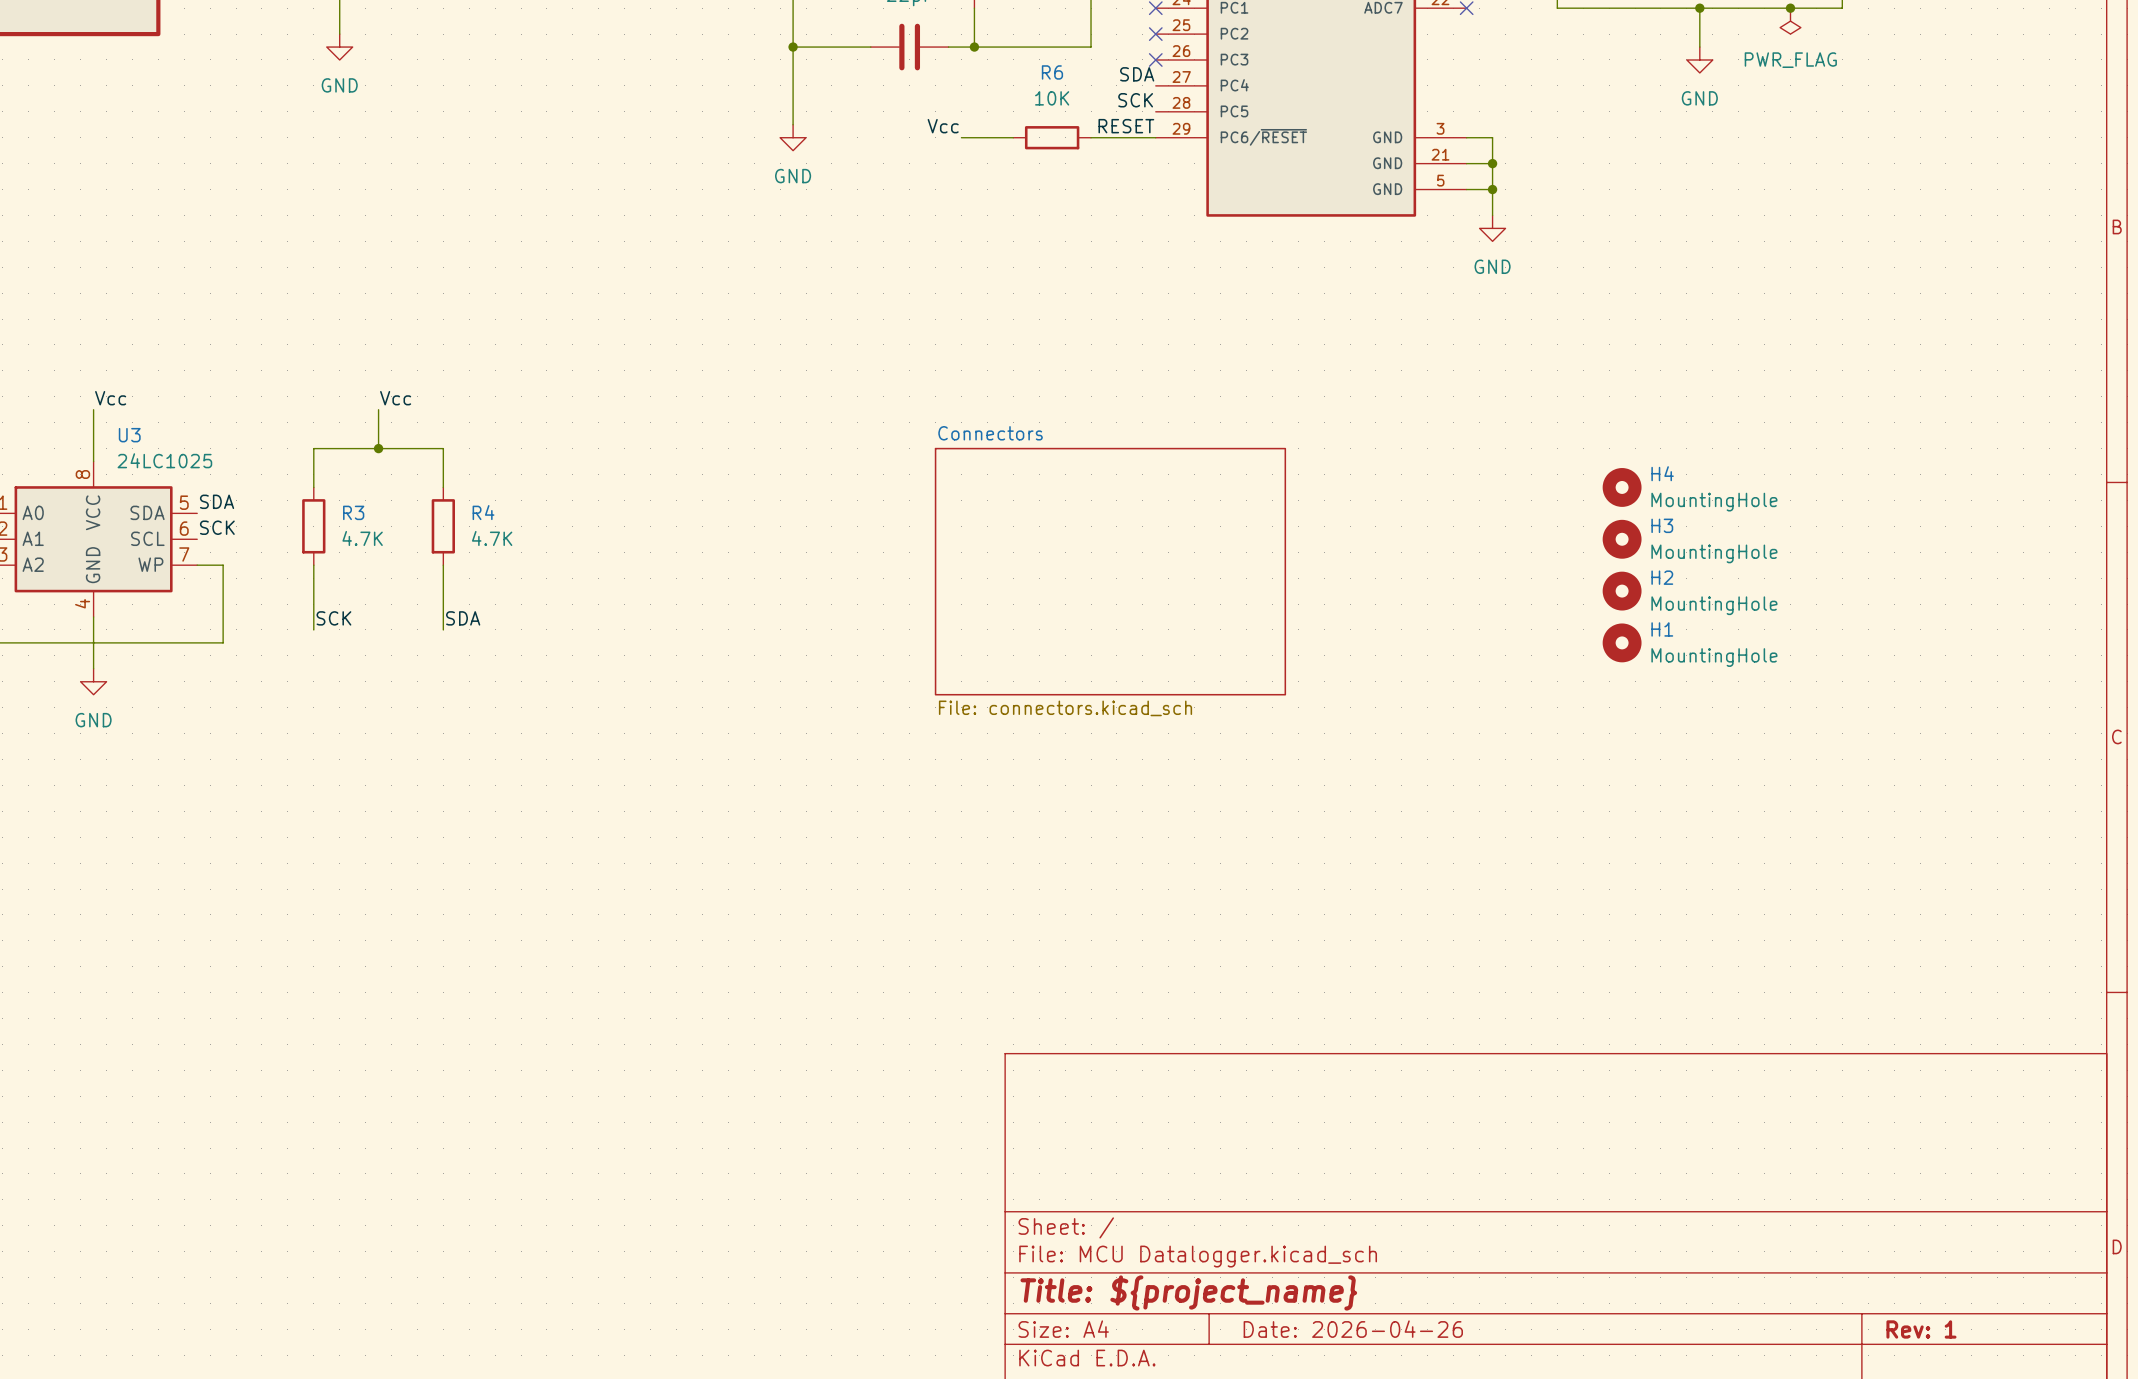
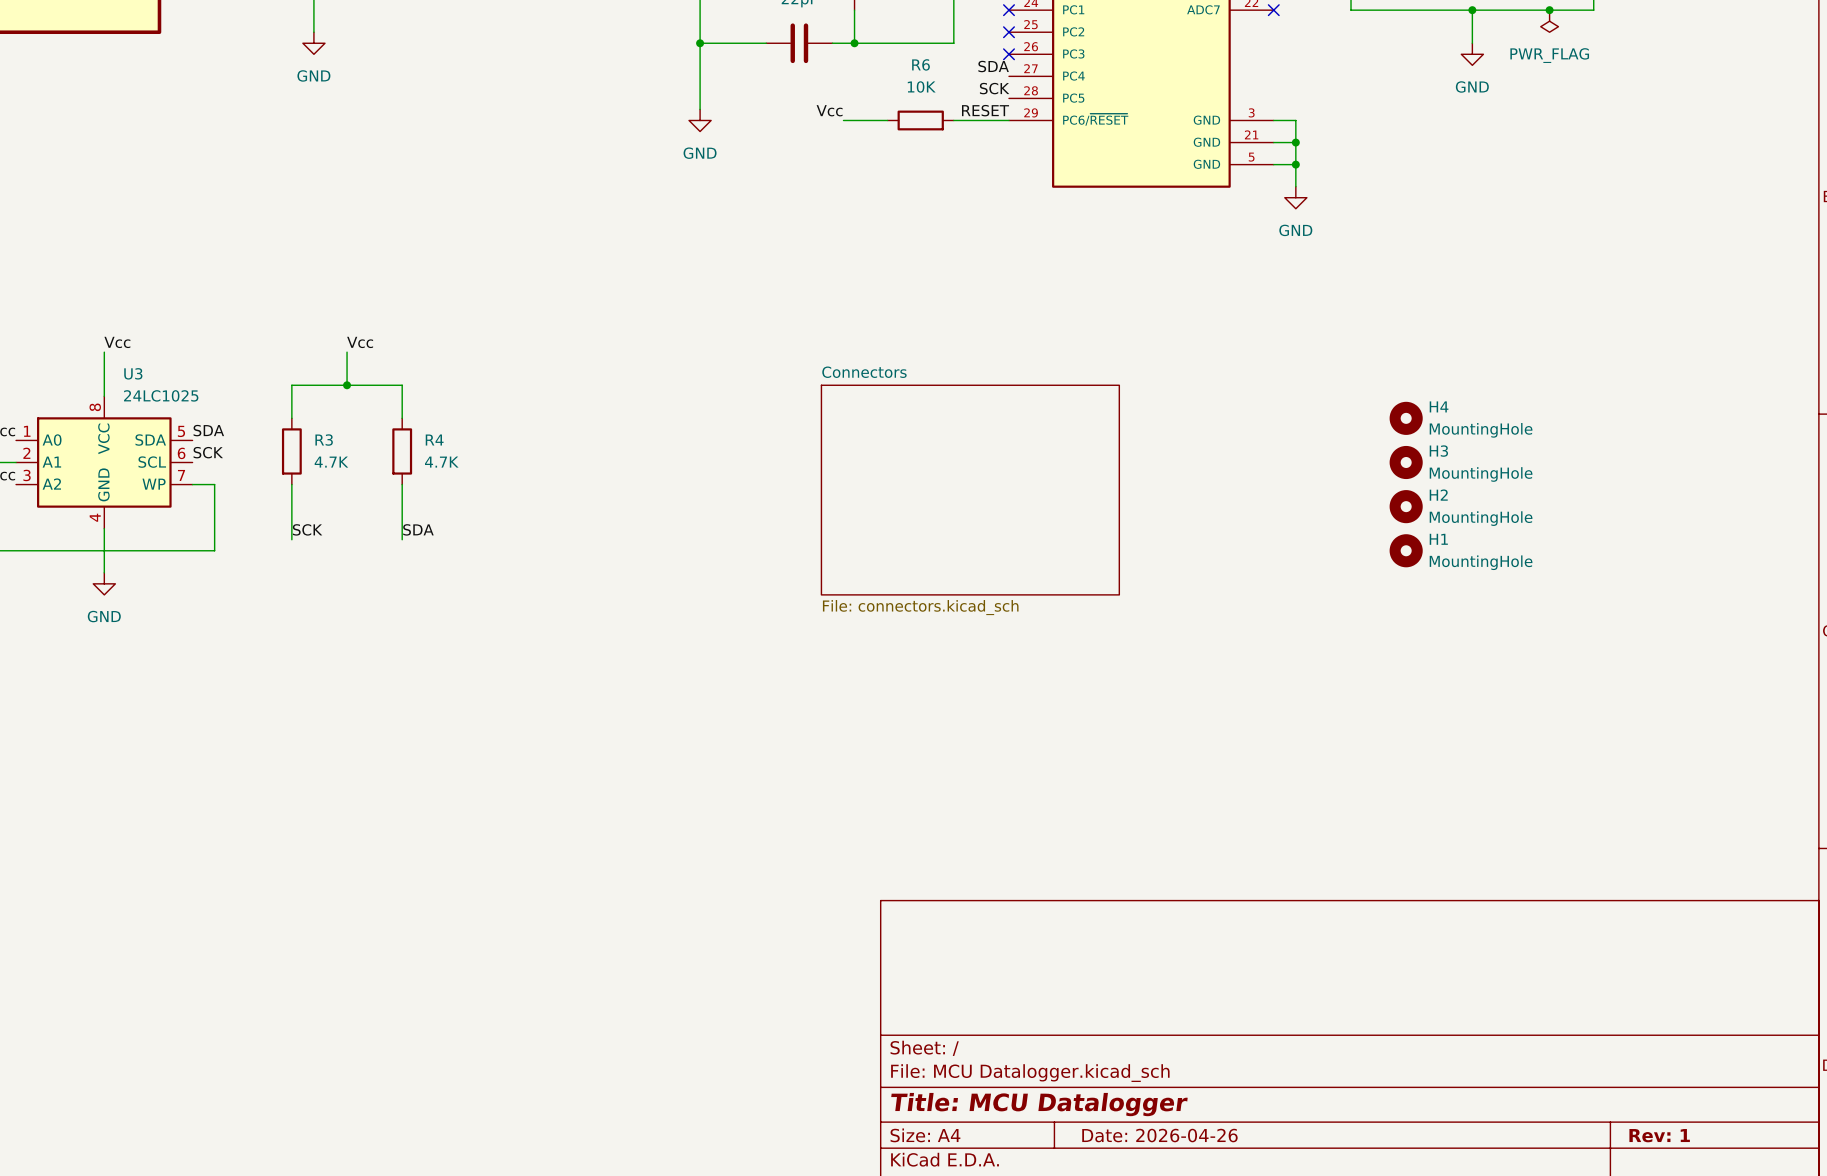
title block: Title: ${project_name} (1188, 1292) -> Title: MCU Datalogger (1039, 1104)

